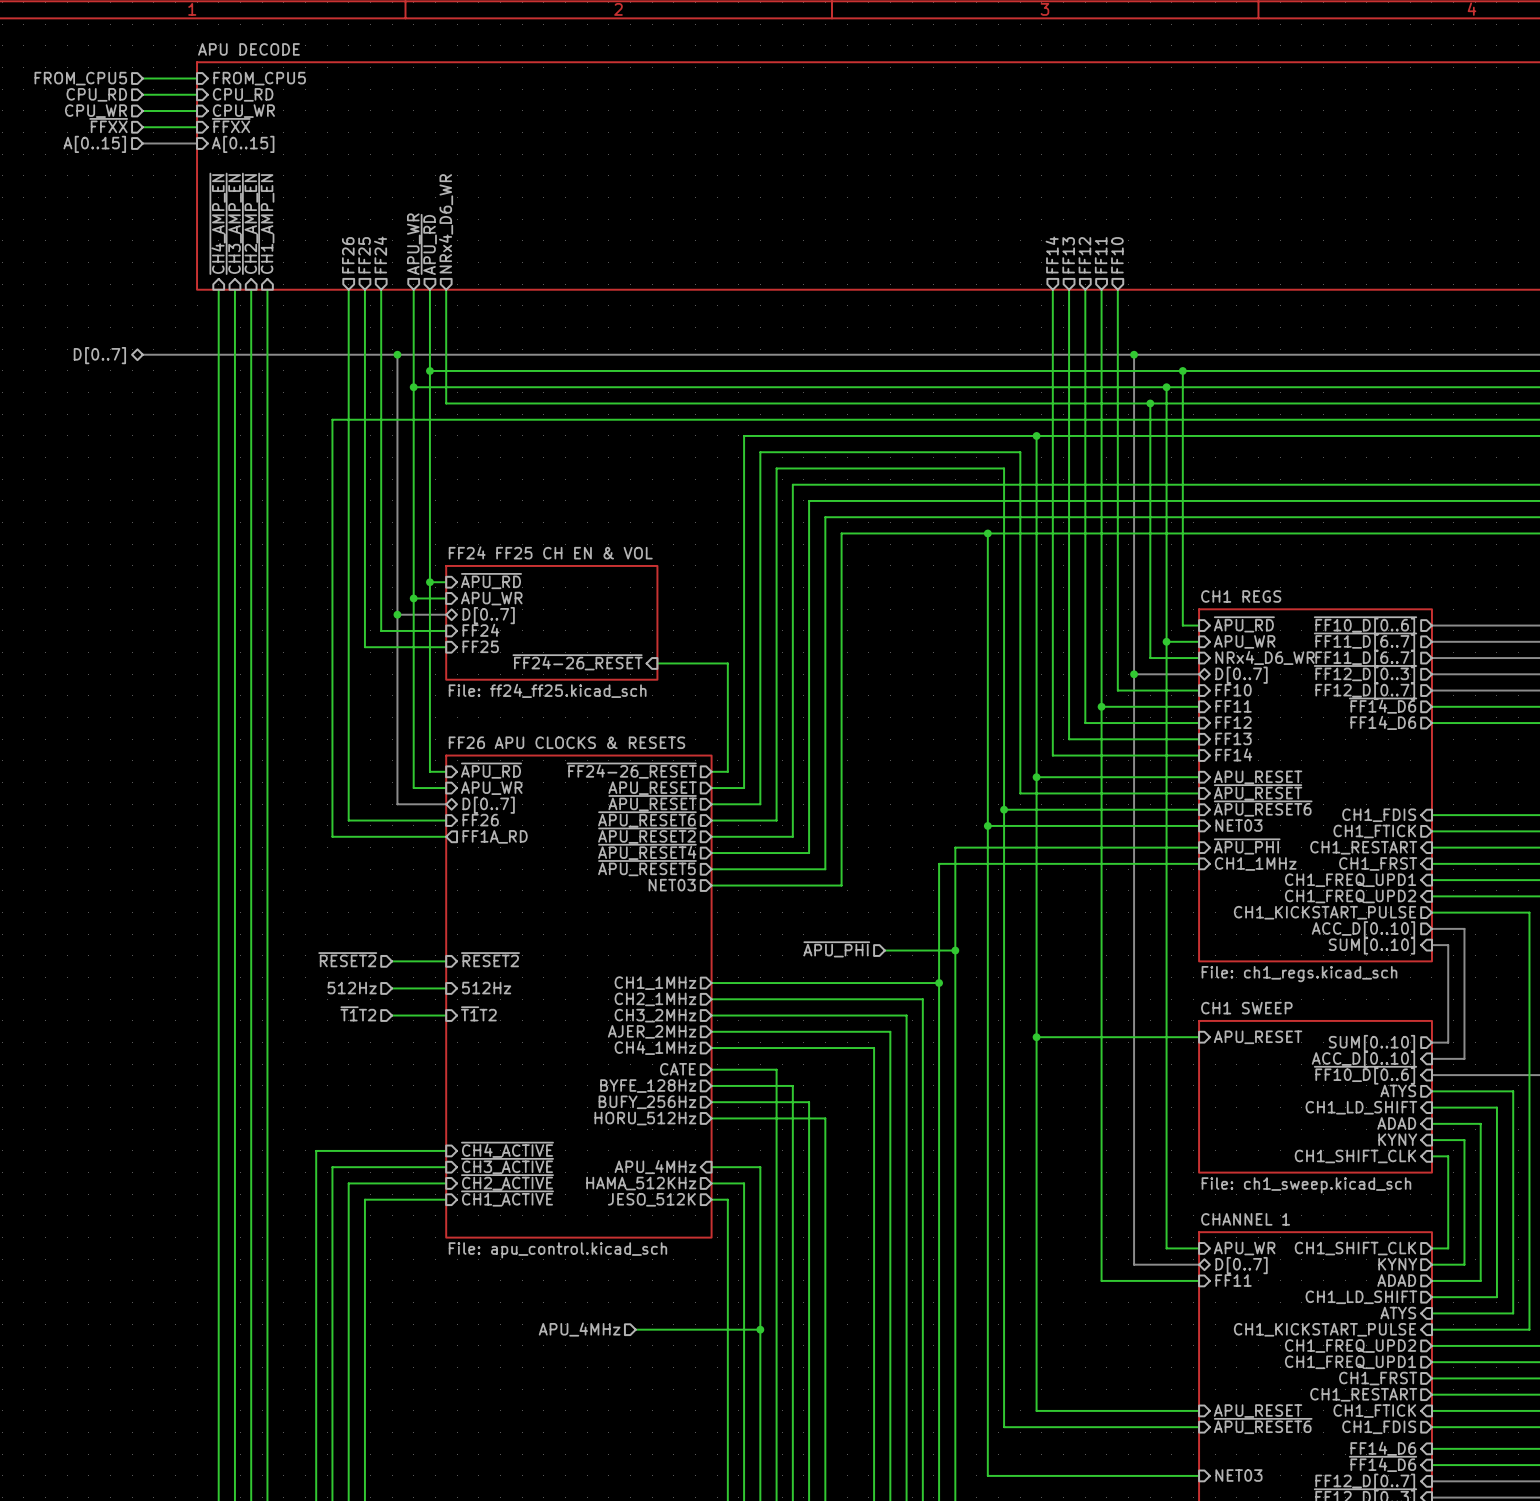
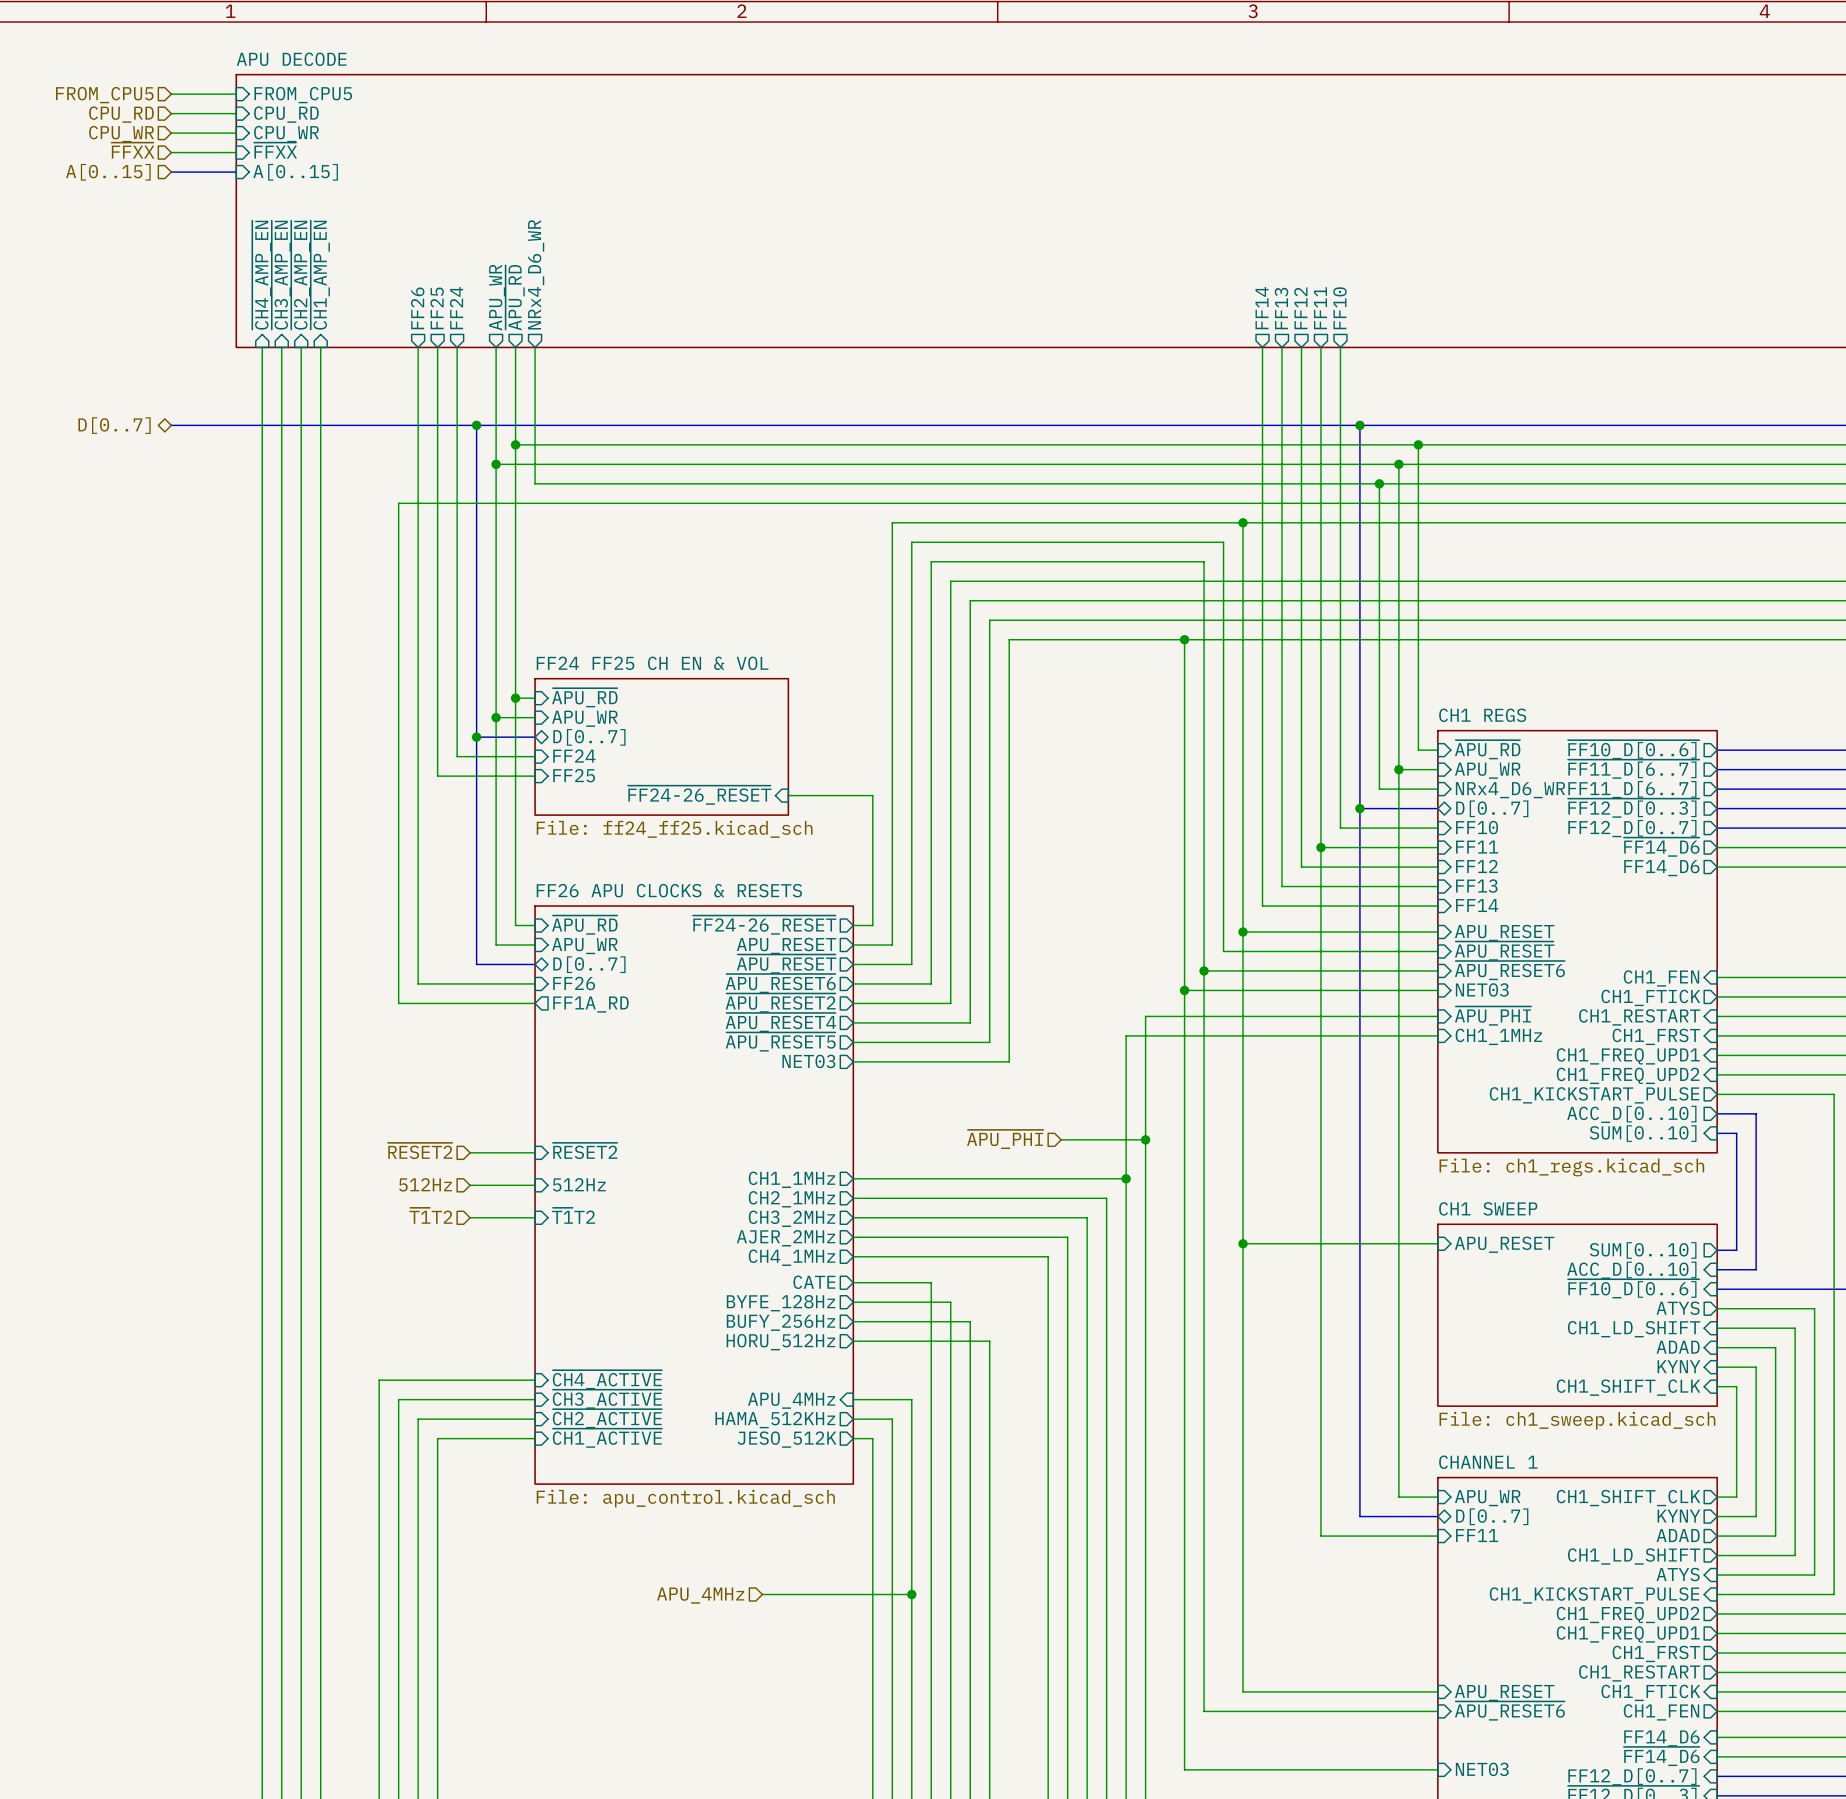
sheet pin: CH1_FDIS (1379, 815) -> CH1_FEN (1661, 978)
sheet pin: CH1_FDIS (1379, 1427) -> CH1_FEN (1661, 1712)

